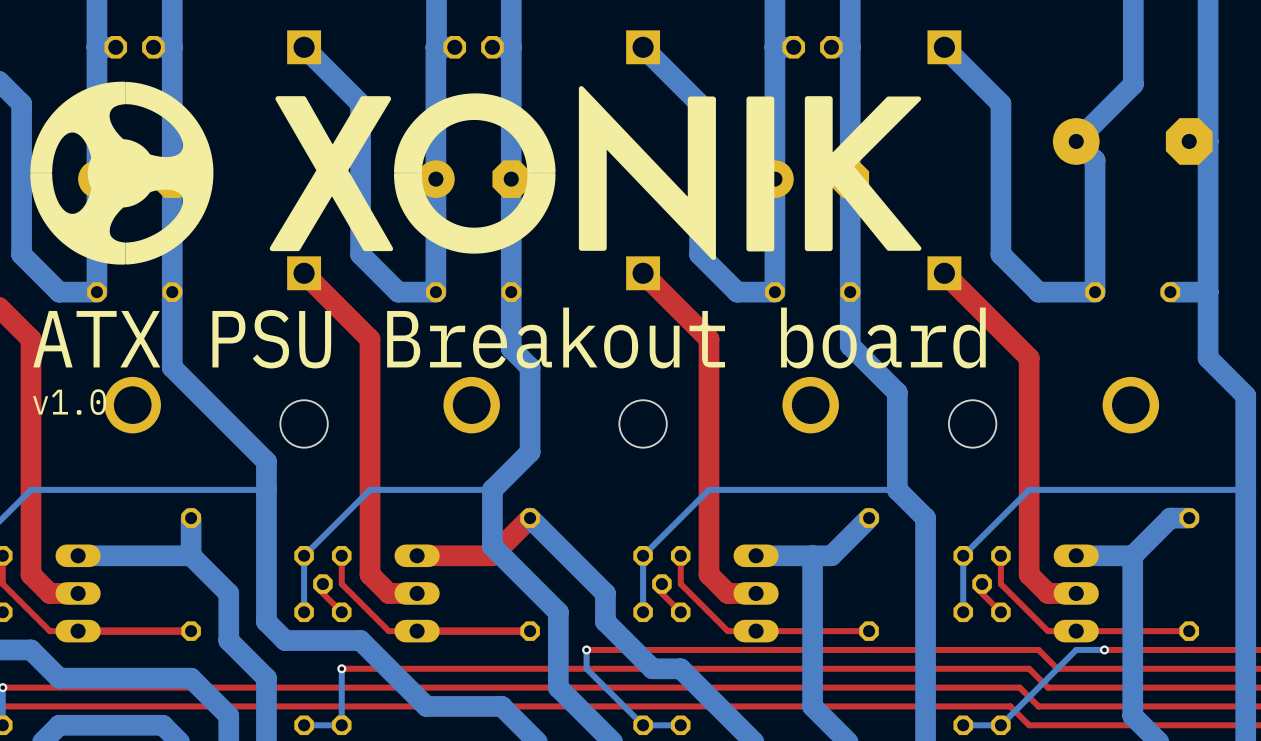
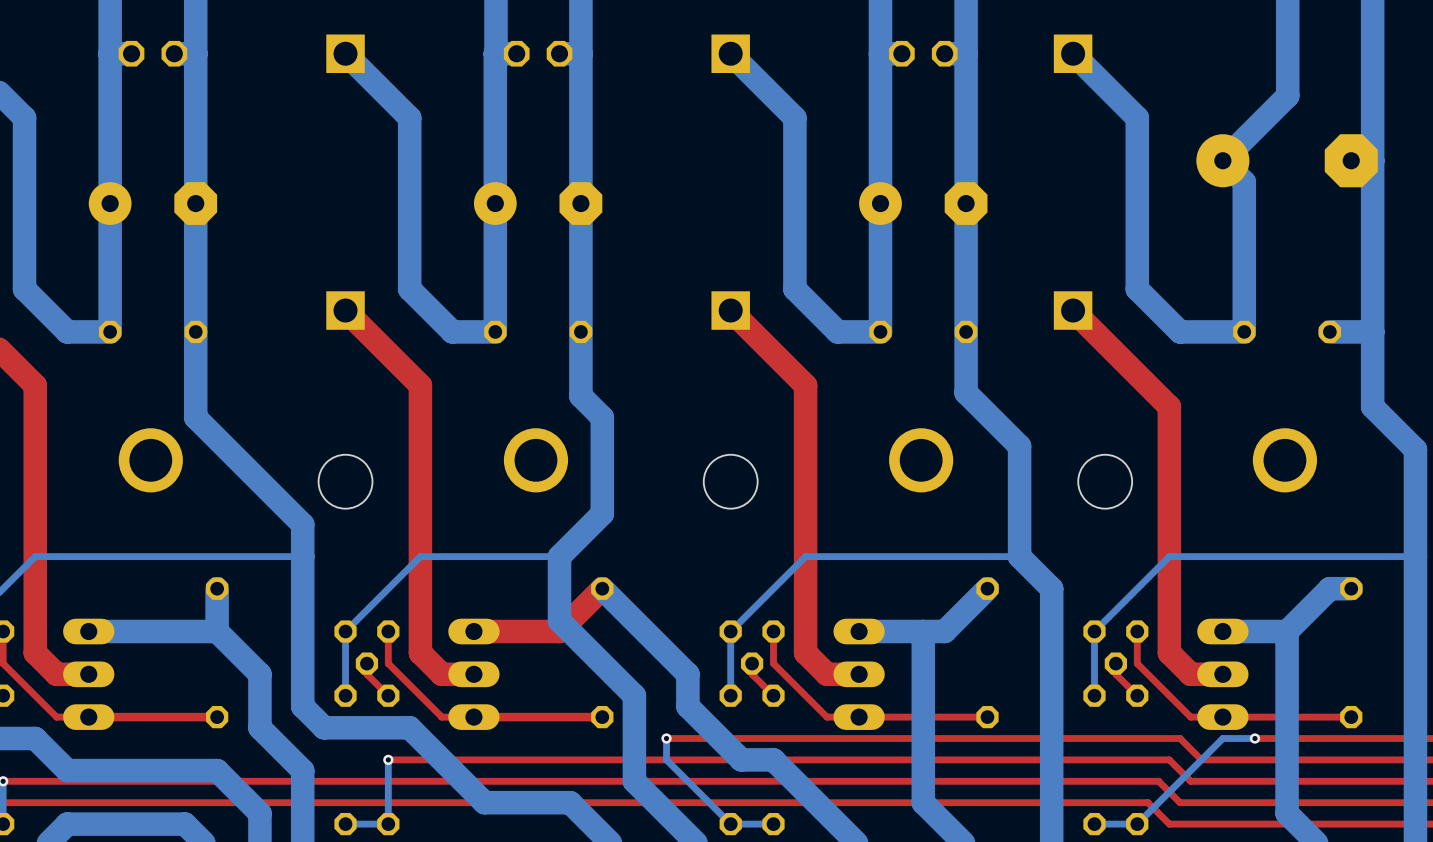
drawing: [30, 81, 922, 265] -> none
text: ATX PSU Breakout board (509, 337) -> none
text: v1.0 (69, 402) -> none

